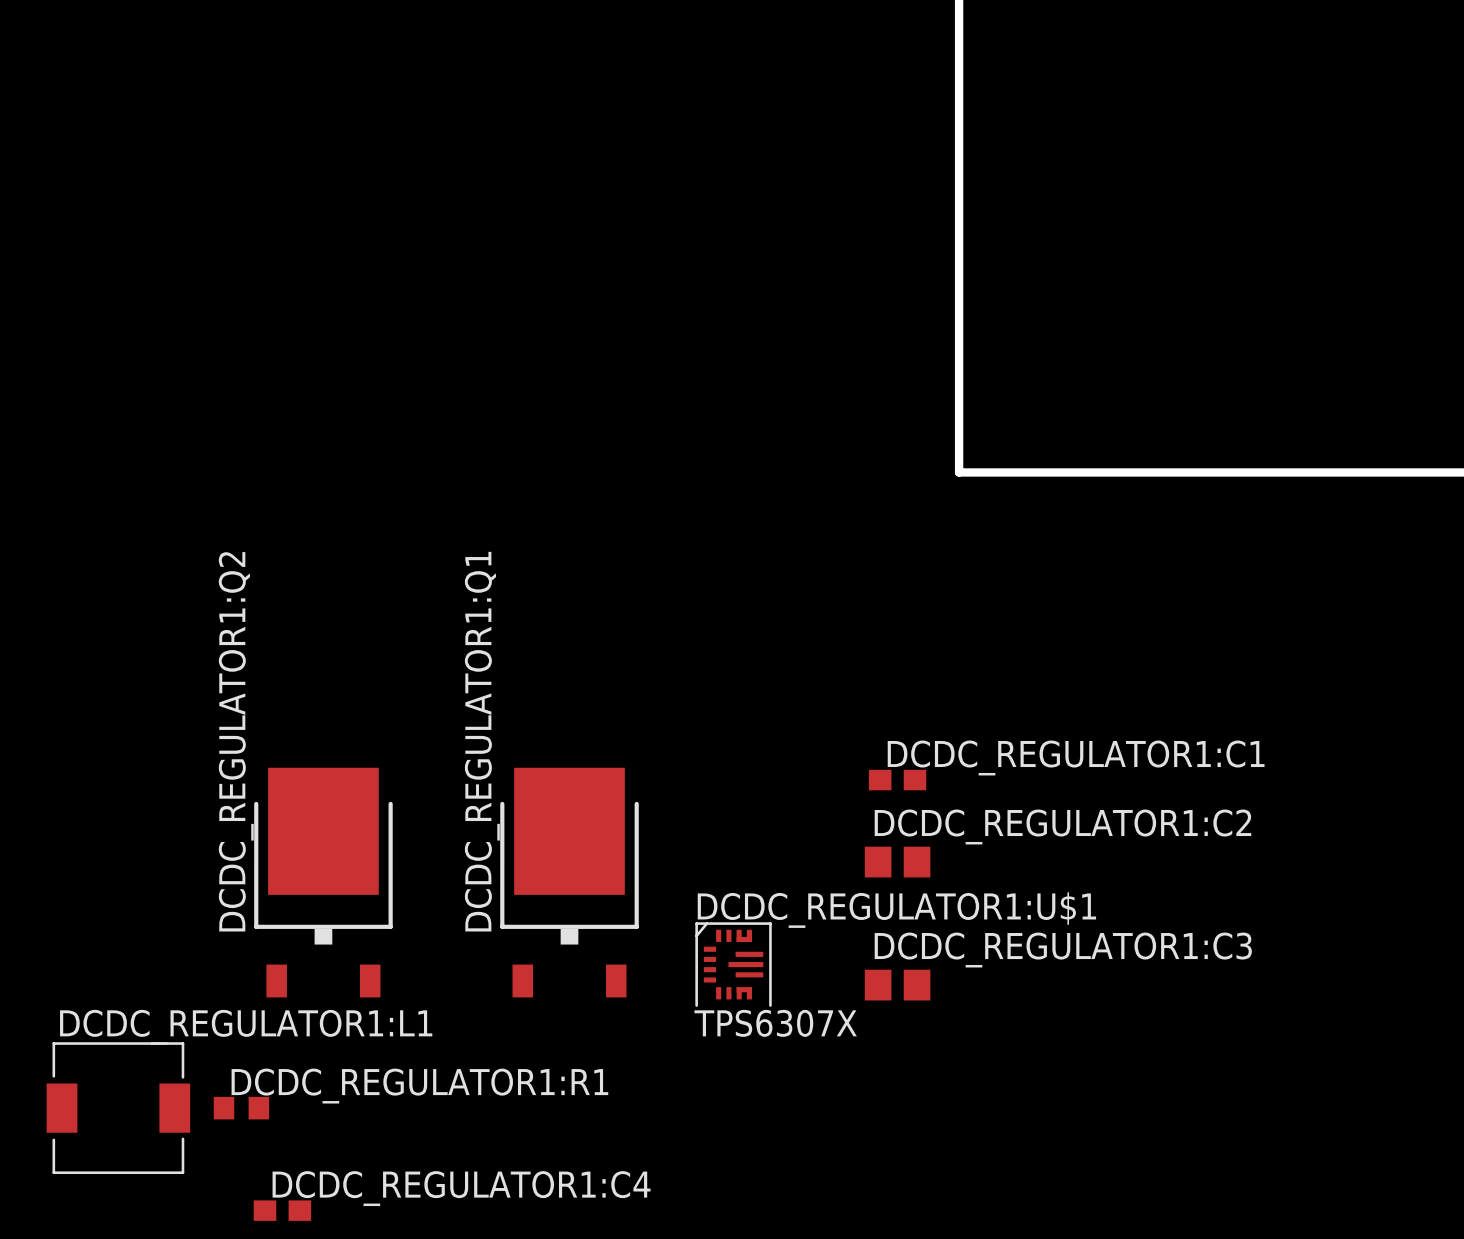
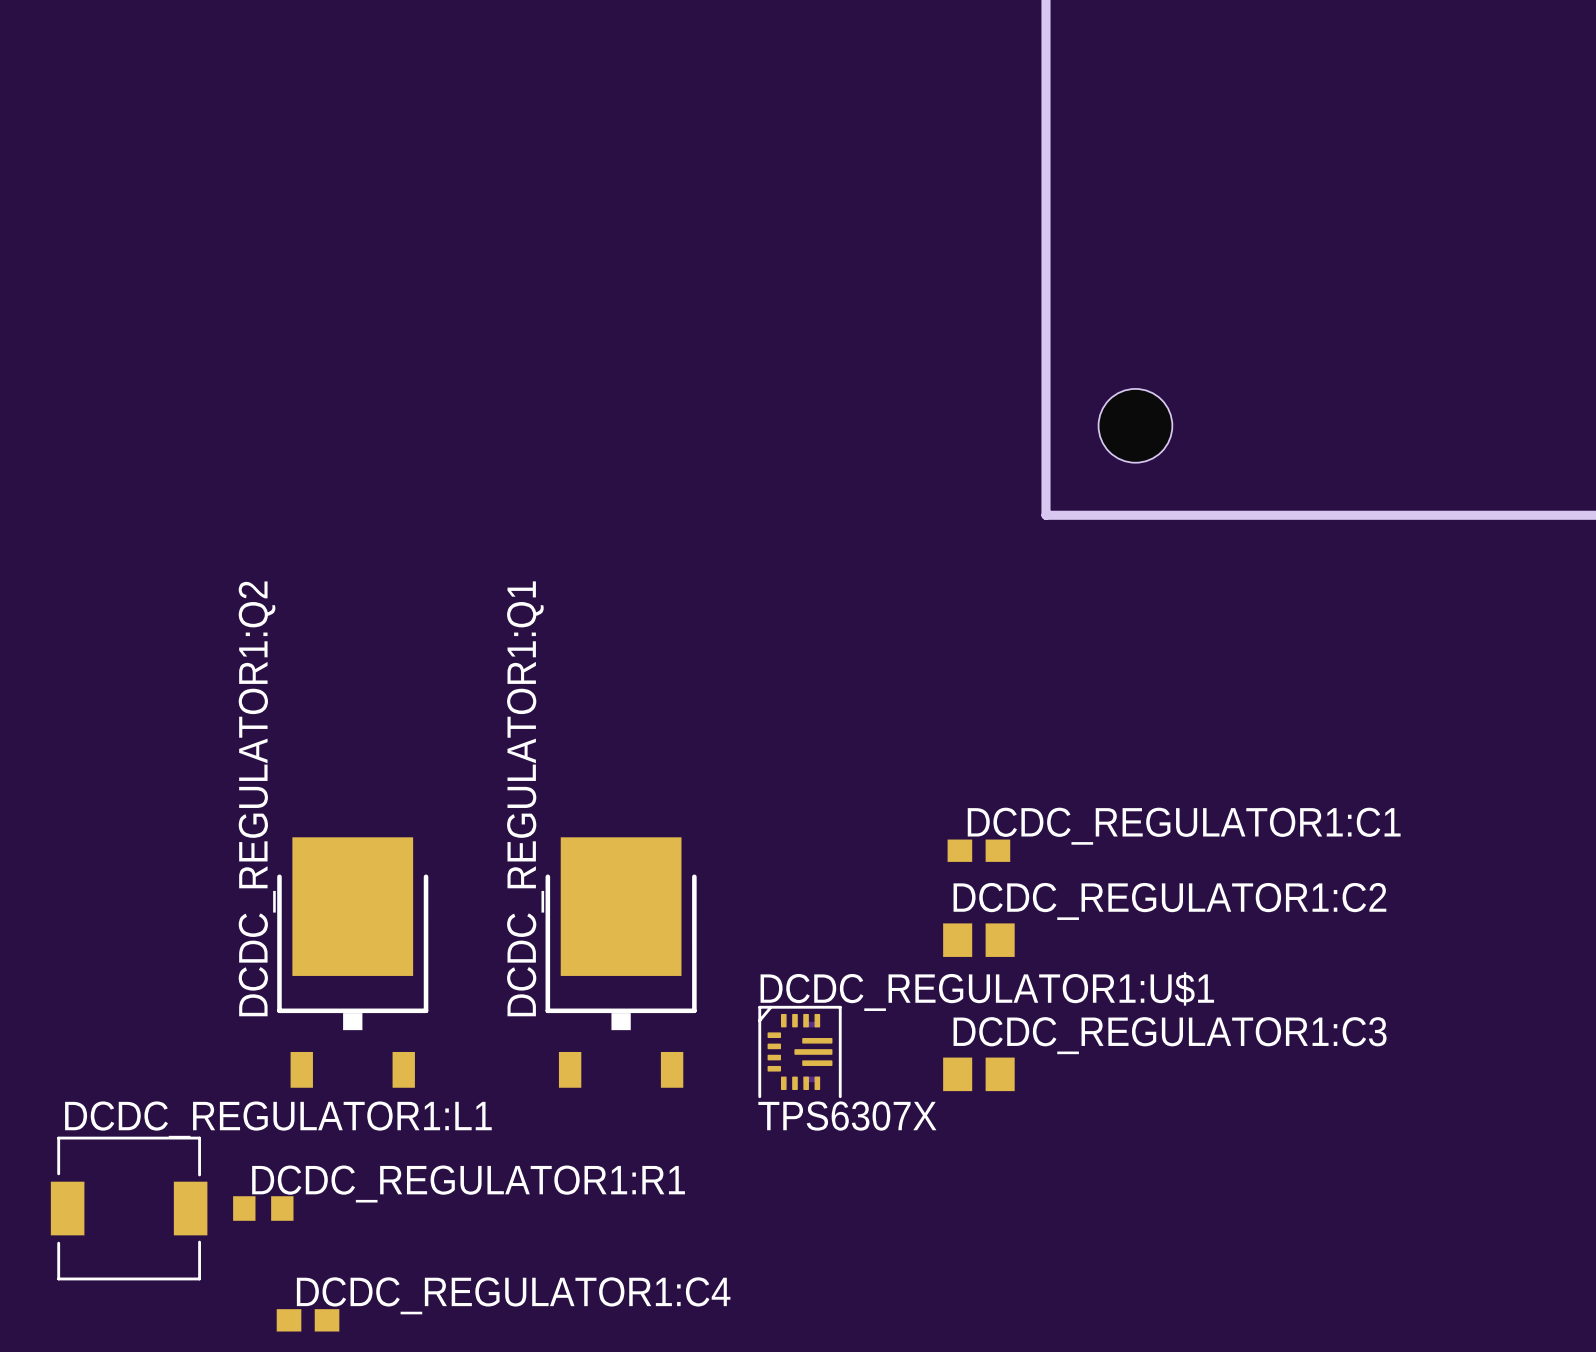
hole: none -> (1135, 425)

